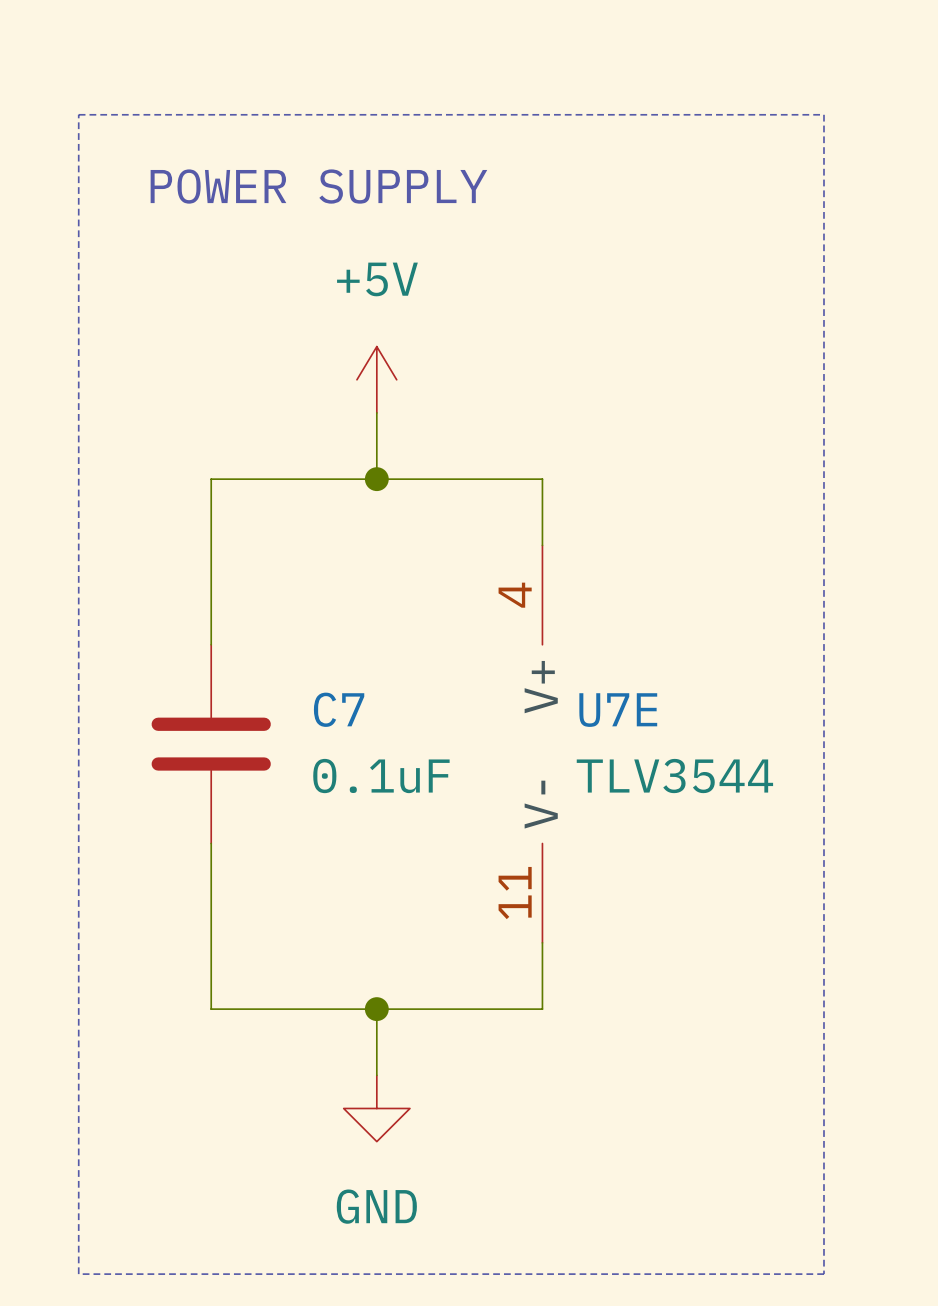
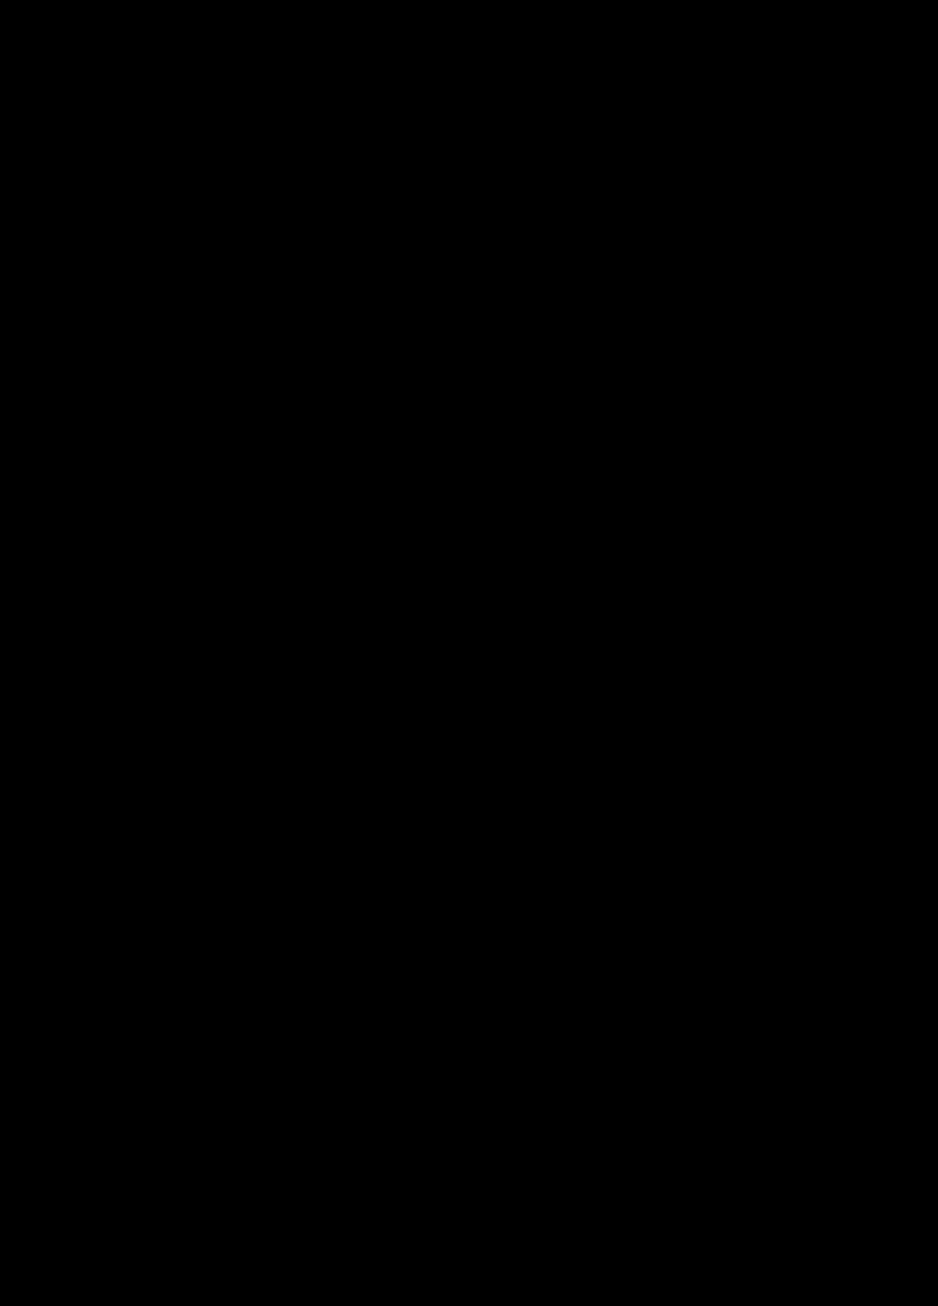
line: (78, 114) (823, 114) (823, 1274) (78, 1274) (78, 114) -> none
text: POWER SUPPLY (318, 186) -> none
power symbol: +5V (376, 379) -> none
wire: (376, 412) (376, 479) -> none
junction: (376, 479) -> none
wire: (542, 545) (542, 479) (211, 479) (211, 644) -> none
C7: 0.1uF (211, 744) -> none
U7E: TLV3544 (542, 744) -> none
wire: (211, 843) (211, 1009) (542, 1009) (542, 942) -> none
wire: (376, 1009) (376, 1075) -> none
junction: (376, 1009) -> none
power symbol: GND (376, 1108) -> none

